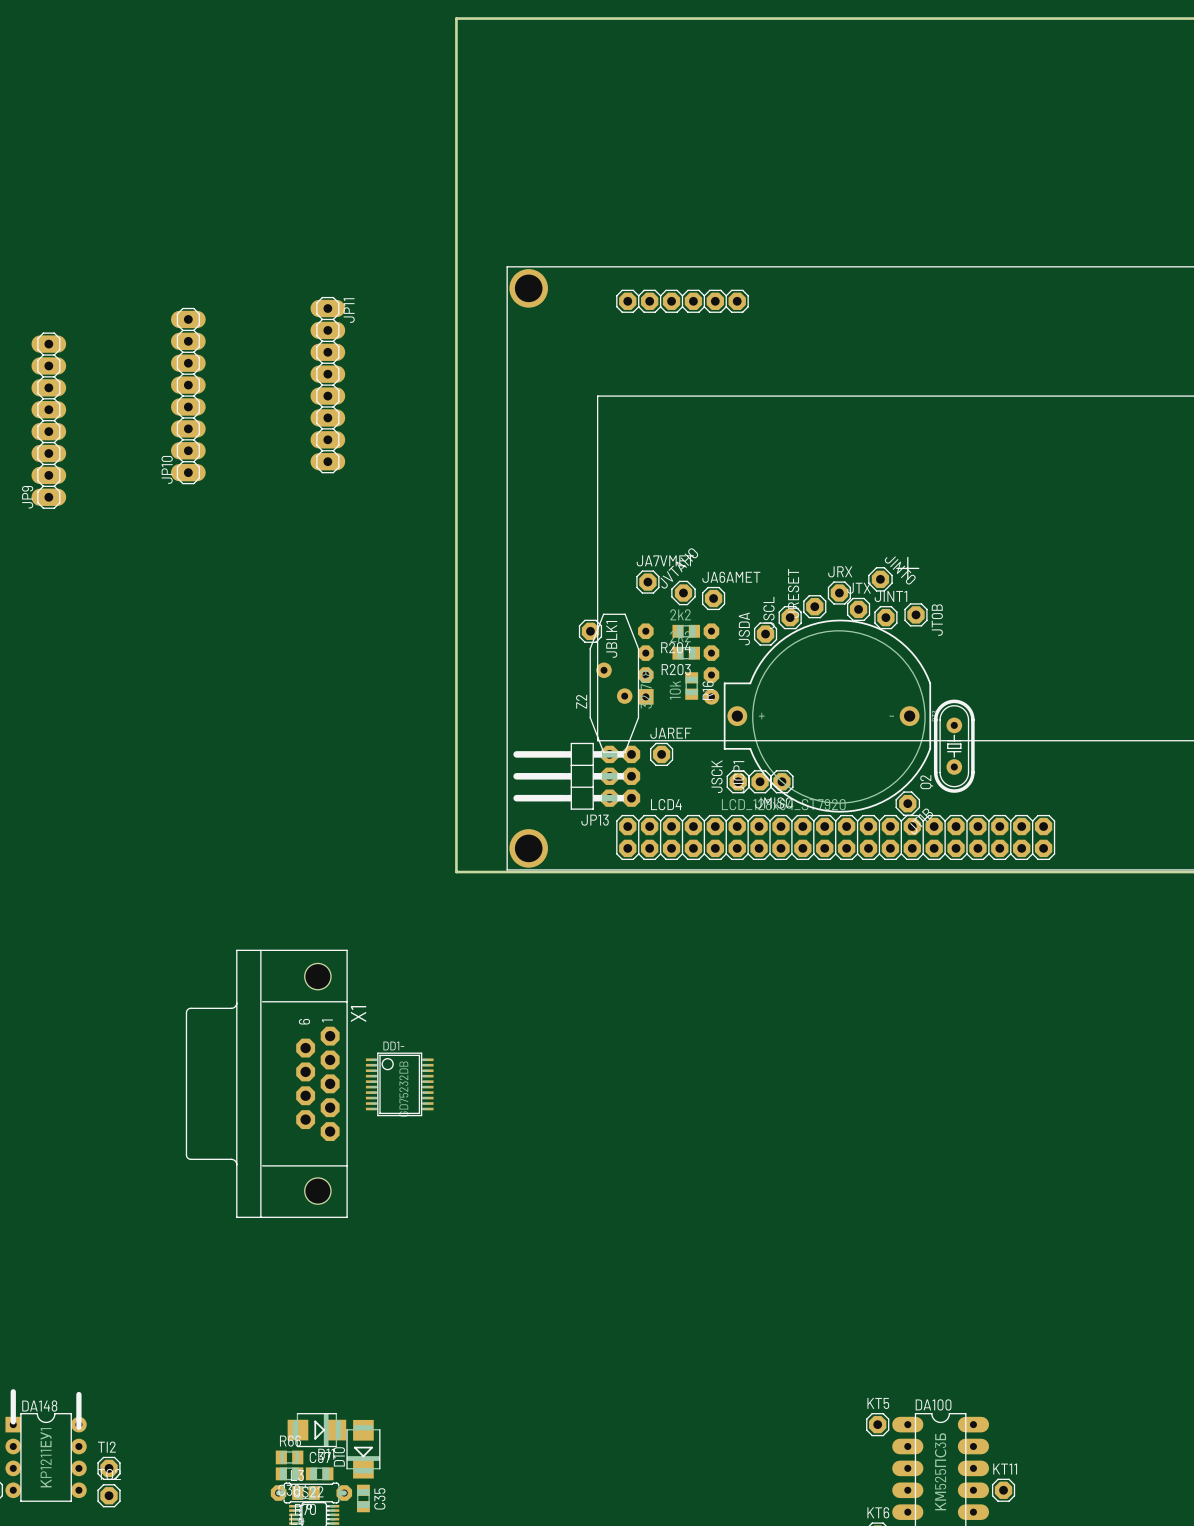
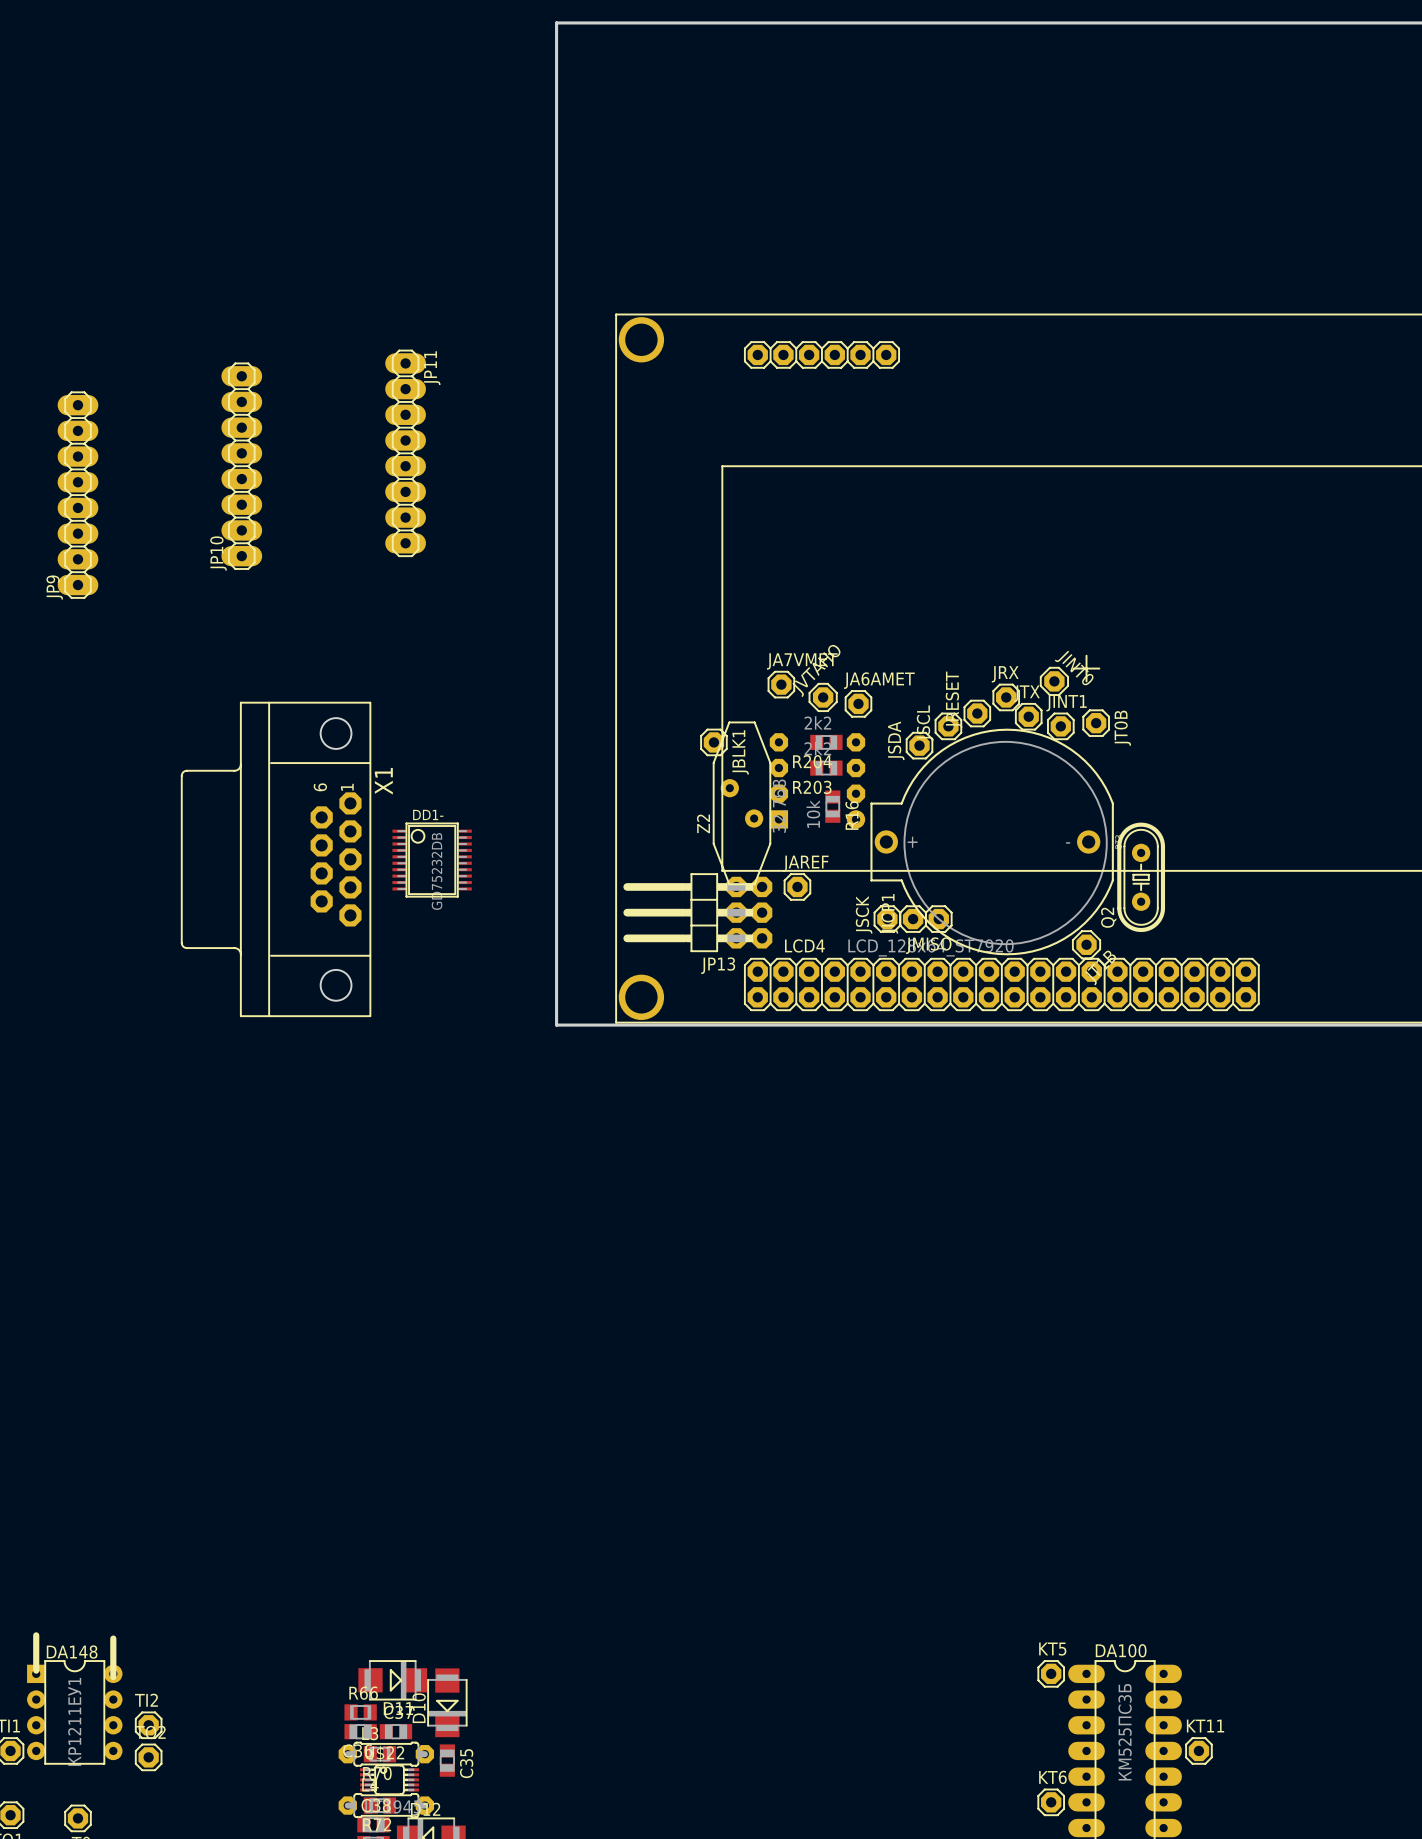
X1 position: (266, 1083) -> (276, 859)
DD1- position: (399, 1084) -> (432, 860)

